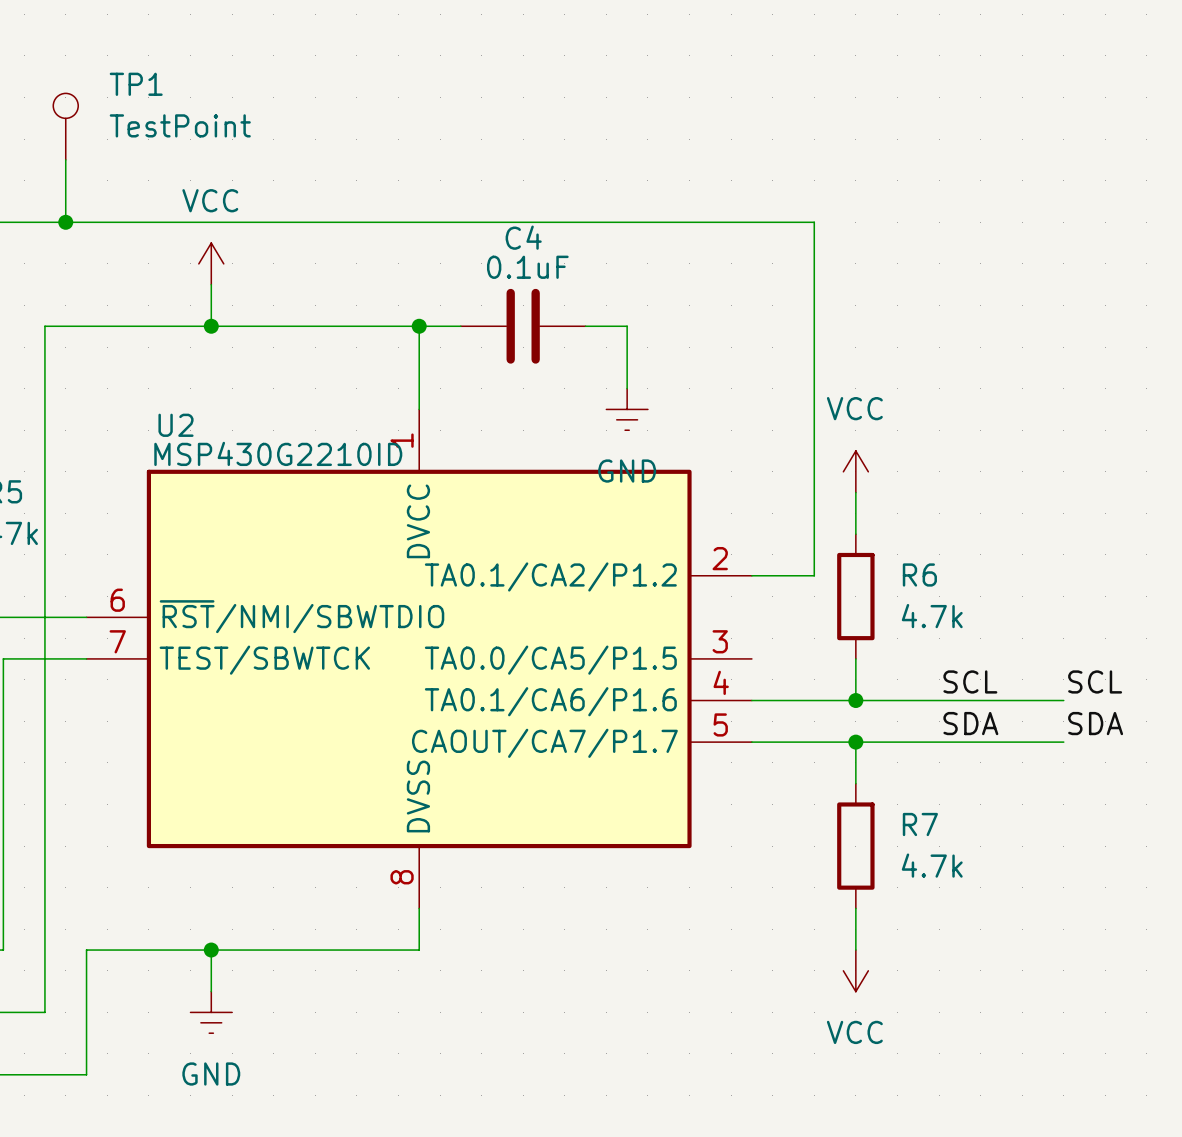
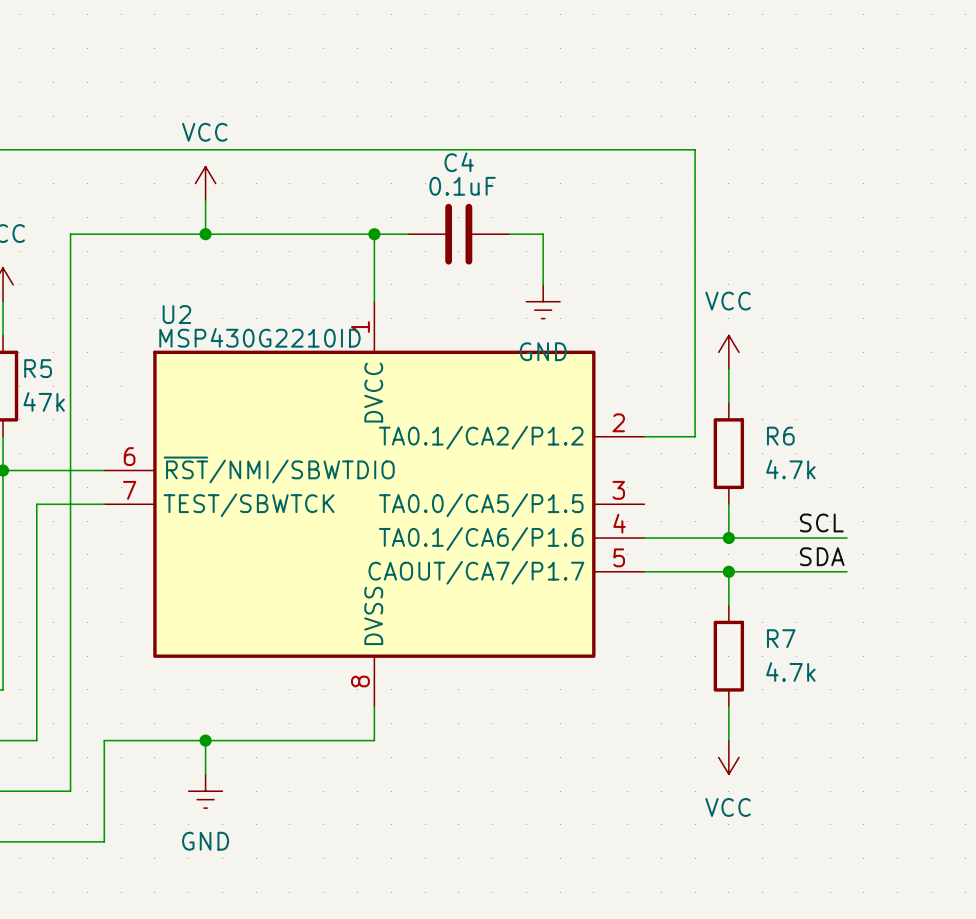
TP1: TestPoint (65, 126) -> none
wire: (65, 159) (65, 222) -> none
junction: (65, 222) -> none
label: SCL (1095, 681) -> none
wire: (1001, 700) (1063, 700) -> none
label: SDA (1095, 723) -> none
wire: (1001, 742) (1063, 742) -> none

